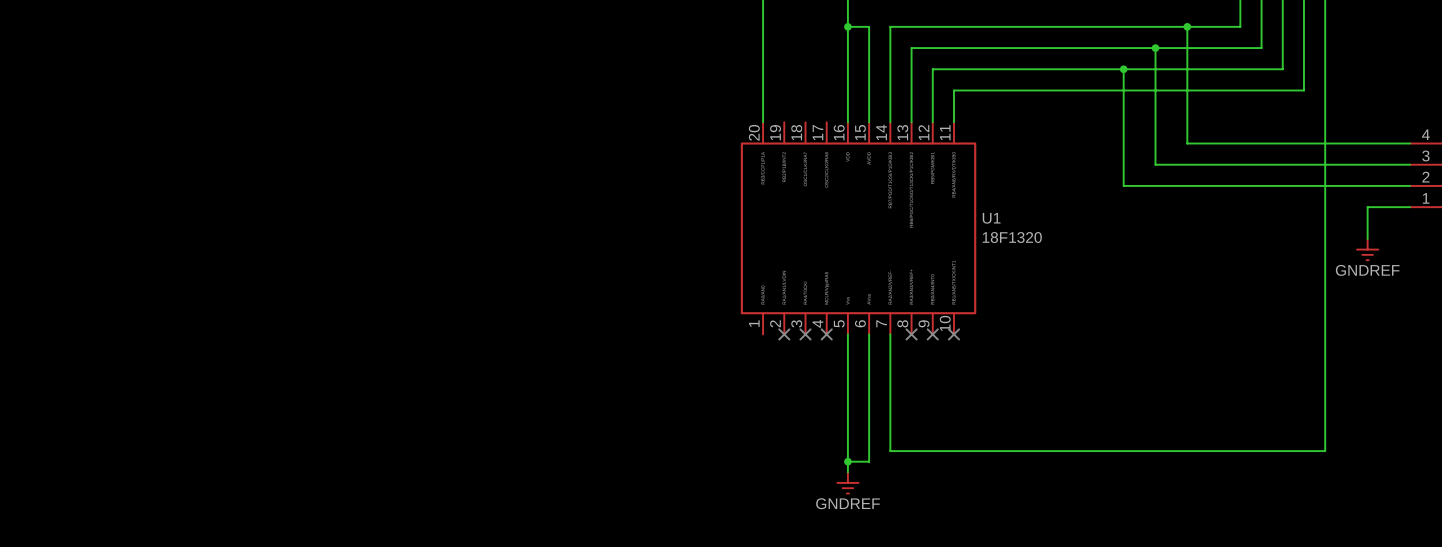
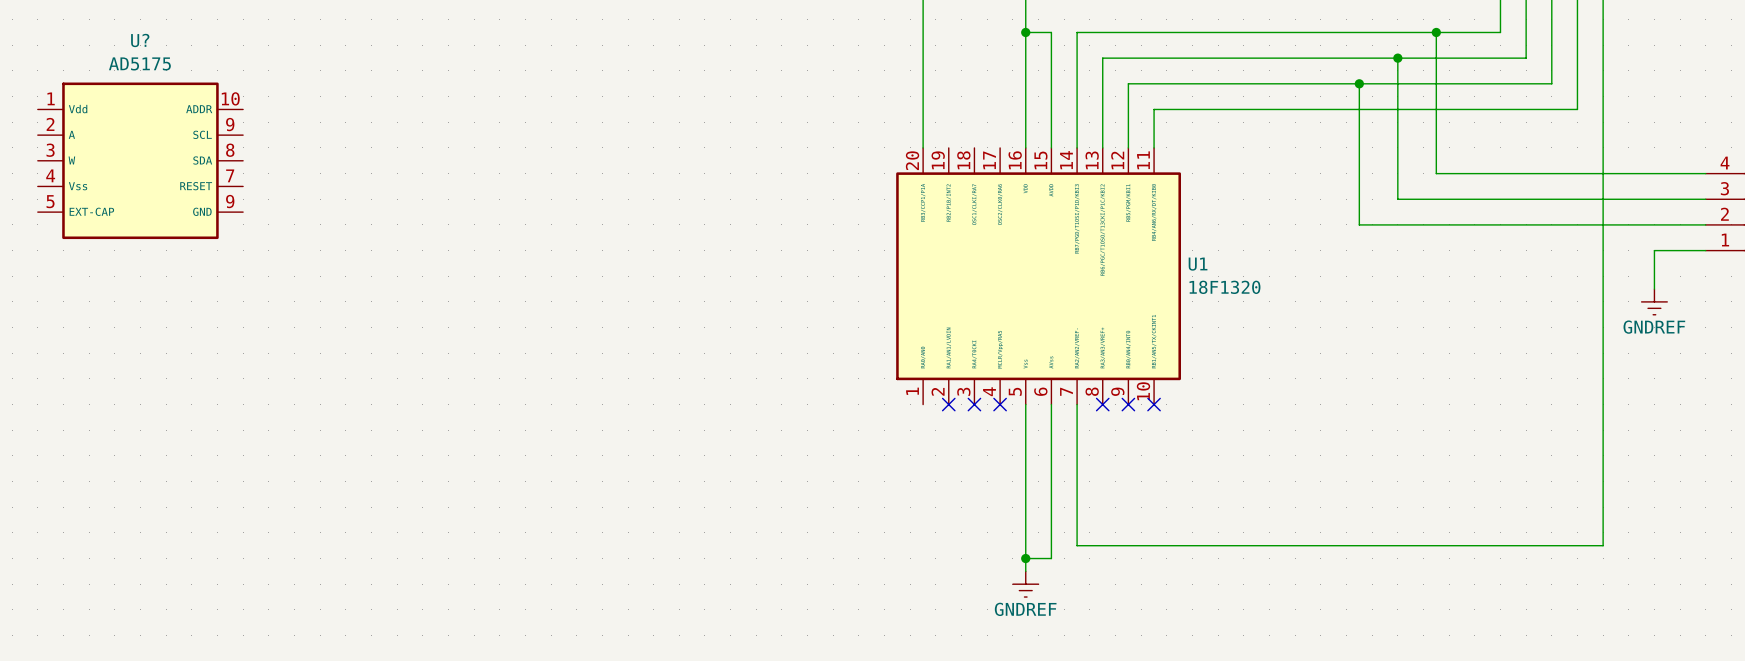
U?: none -> AD5175 (140, 160)

